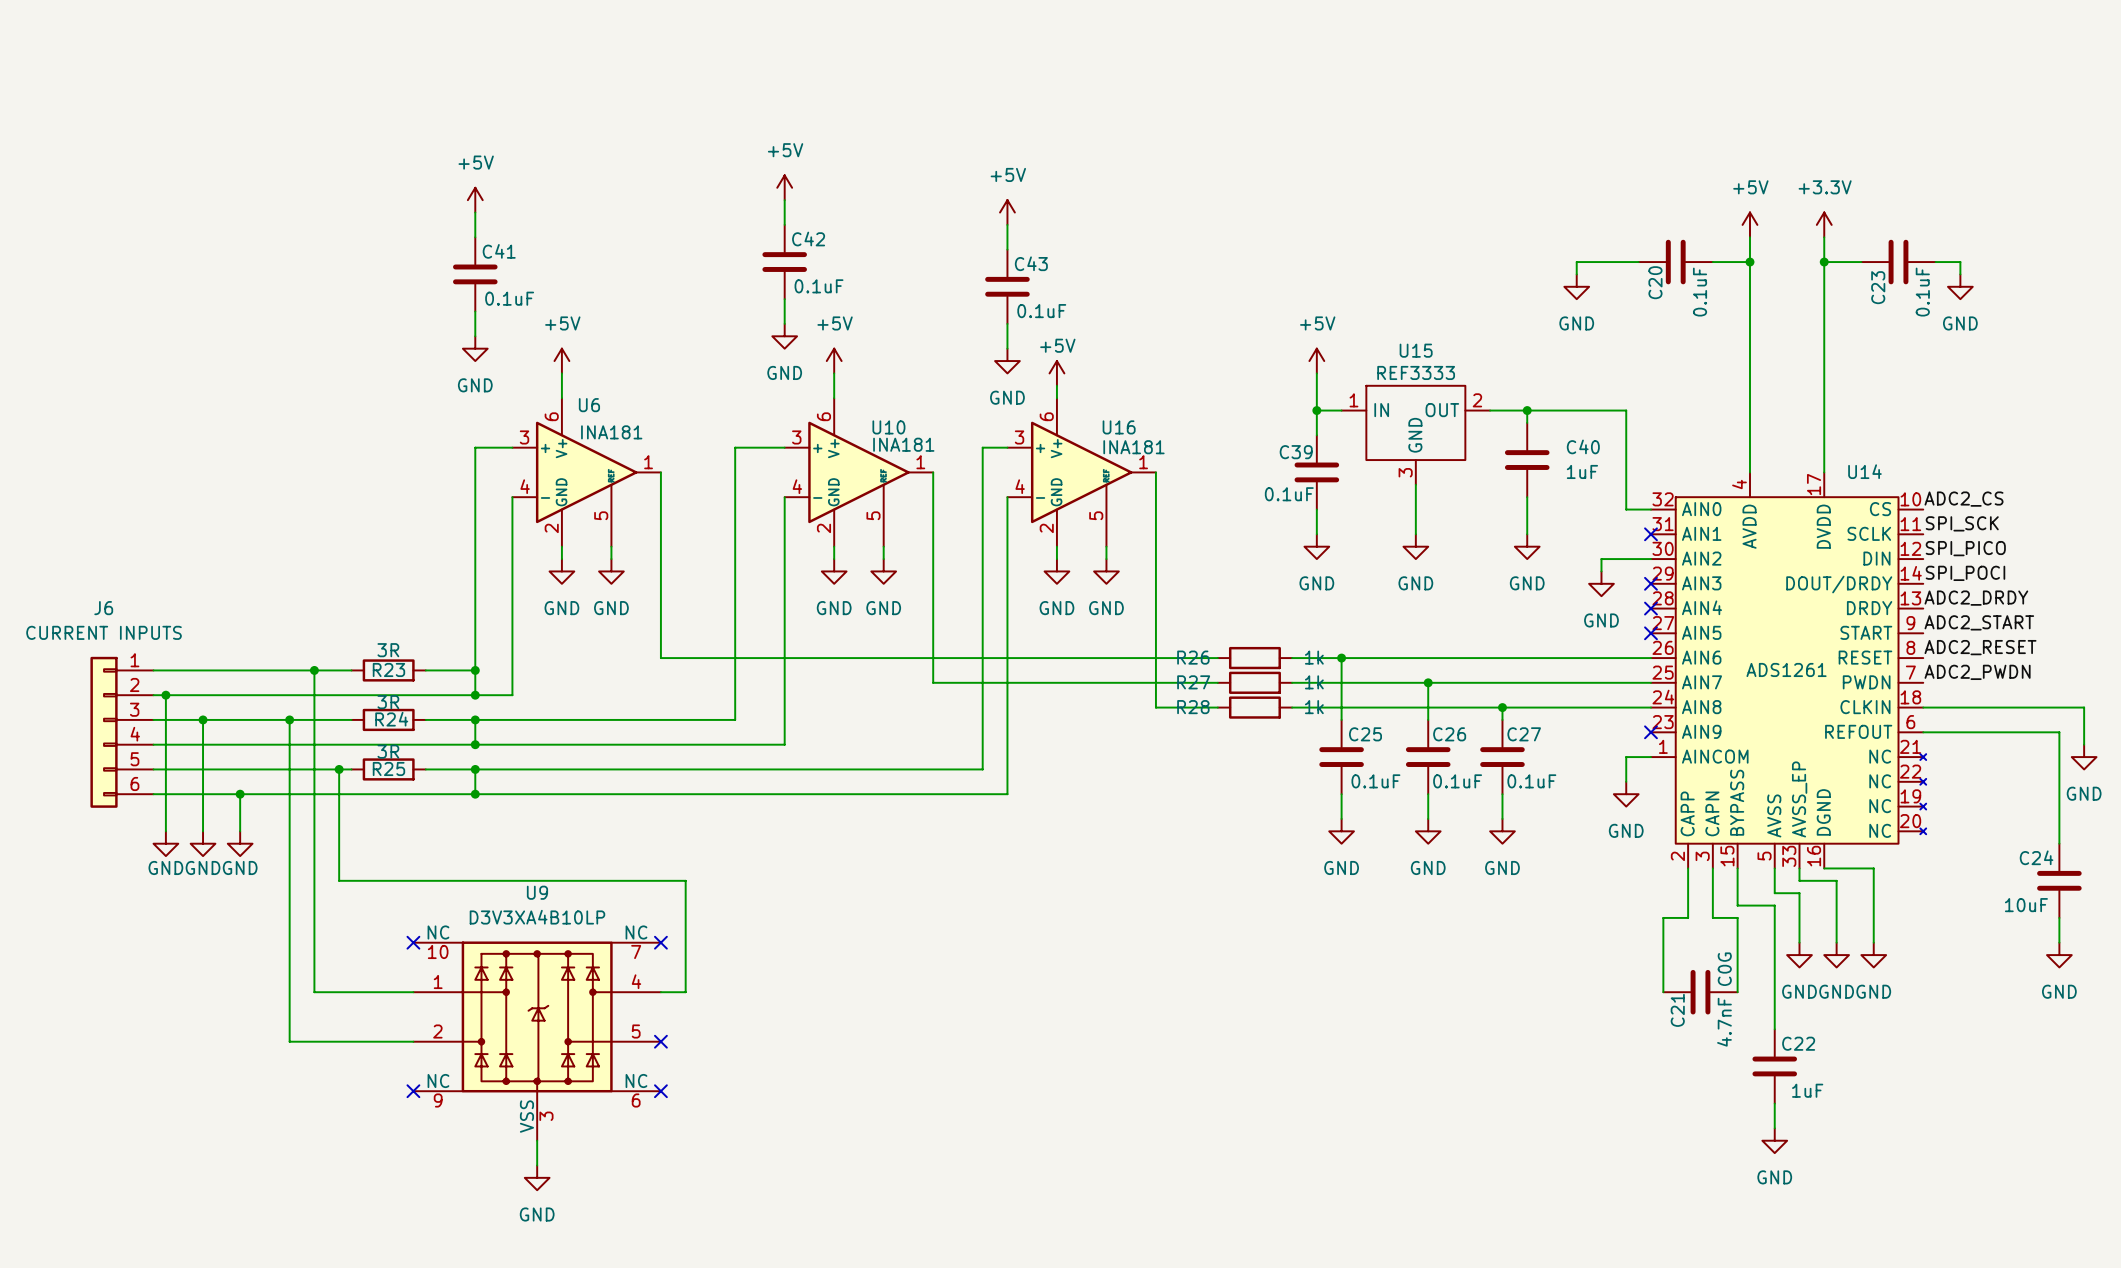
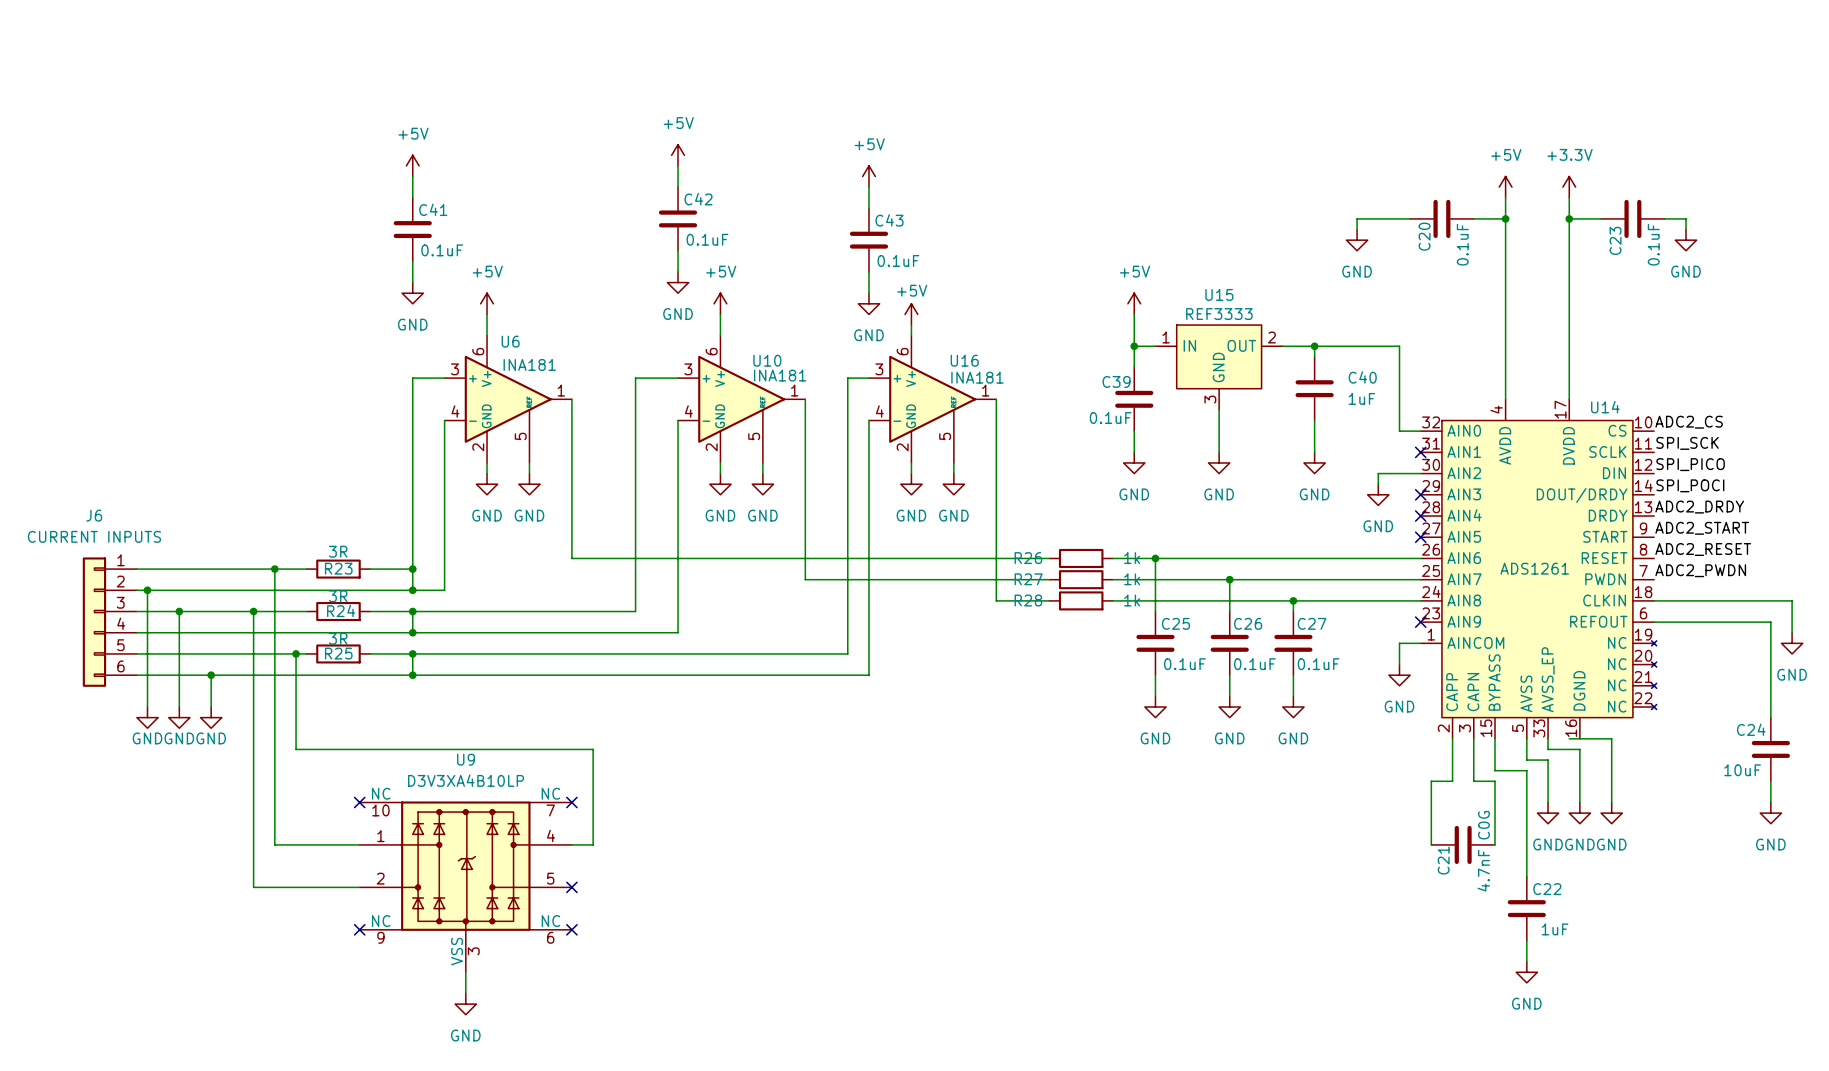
U15 symbol: [1341, 385, 1491, 485] -> [1155, 325, 1283, 410]
U14 symbol: [1650, 472, 1927, 869] -> [1420, 399, 1657, 739]

